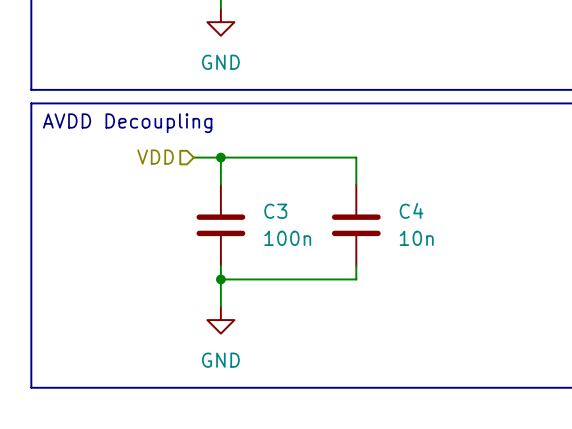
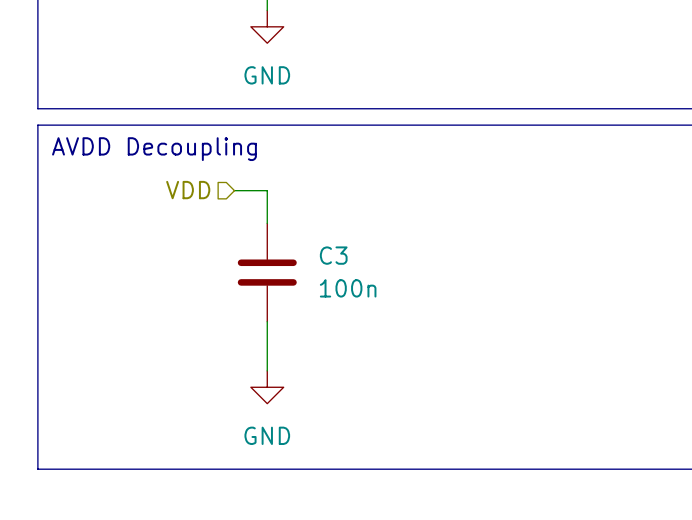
wire: (220, 157) (356, 157) (356, 184) -> none
junction: (220, 157) -> none
C4: 10n (356, 225) -> none
wire: (356, 265) (356, 279) (220, 279) -> none
junction: (220, 279) -> none

